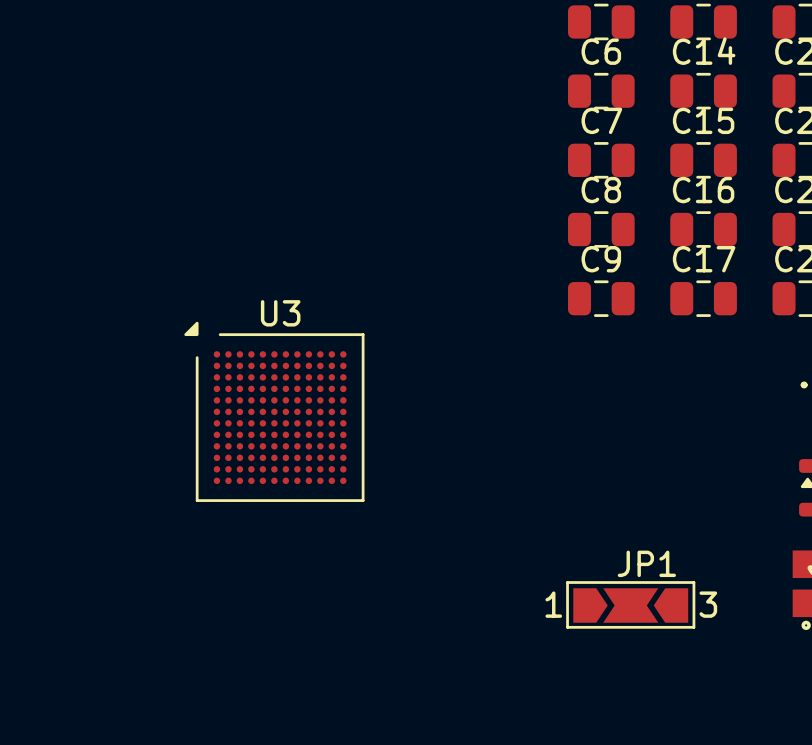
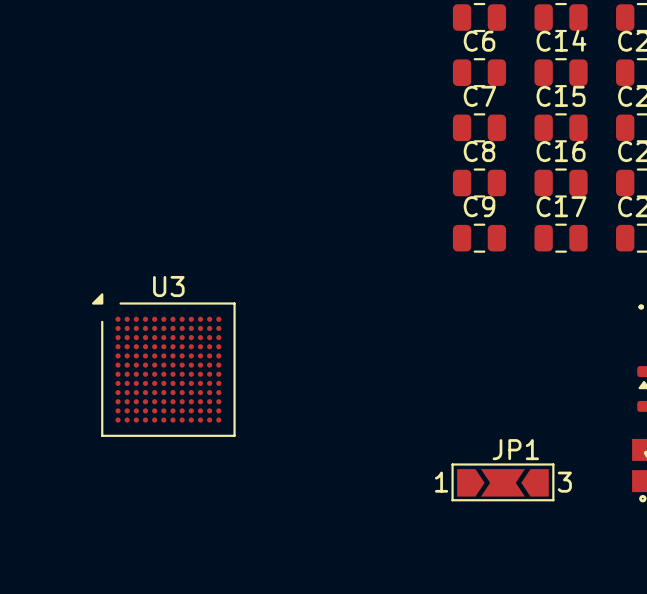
U3 position: (274, 411) -> (163, 365)

